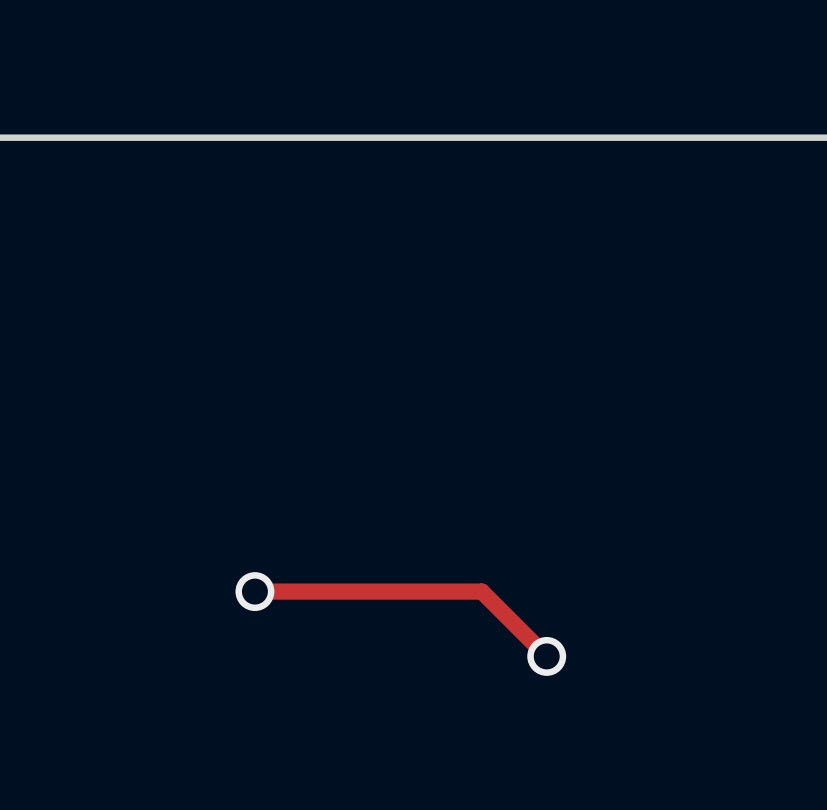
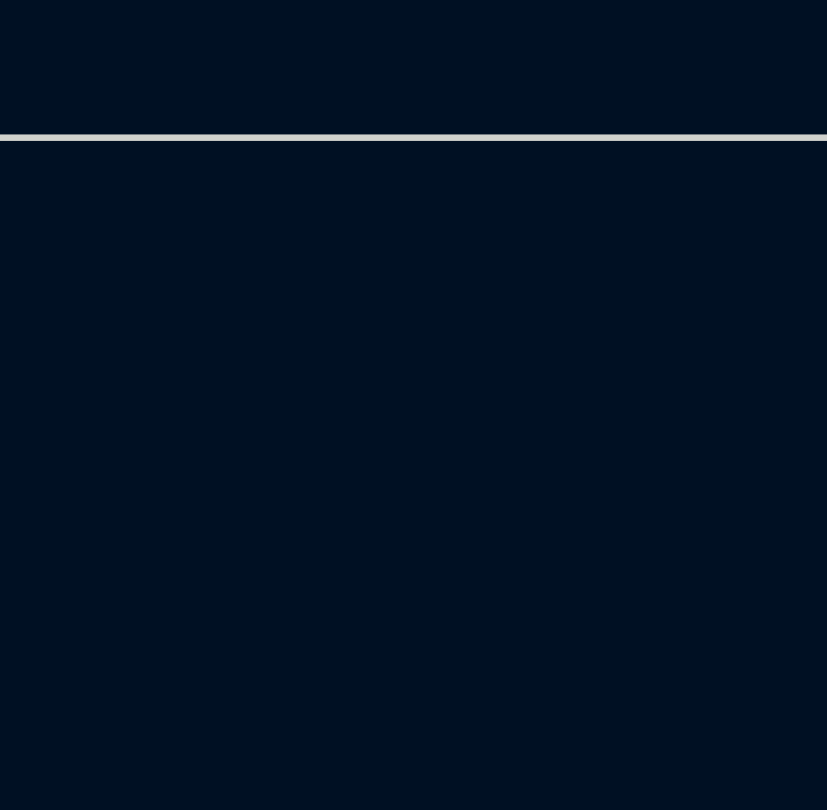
track: (254, 591) (481, 591) (546, 656) -> none
via: (254, 591) -> none
via: (546, 656) -> none

